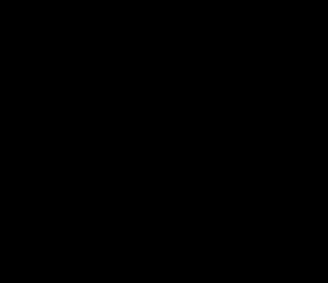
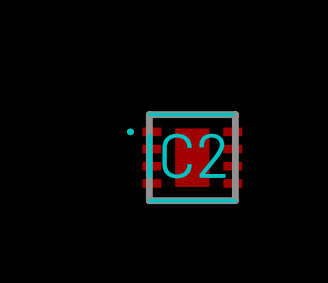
IC2: none -> (184, 157)

